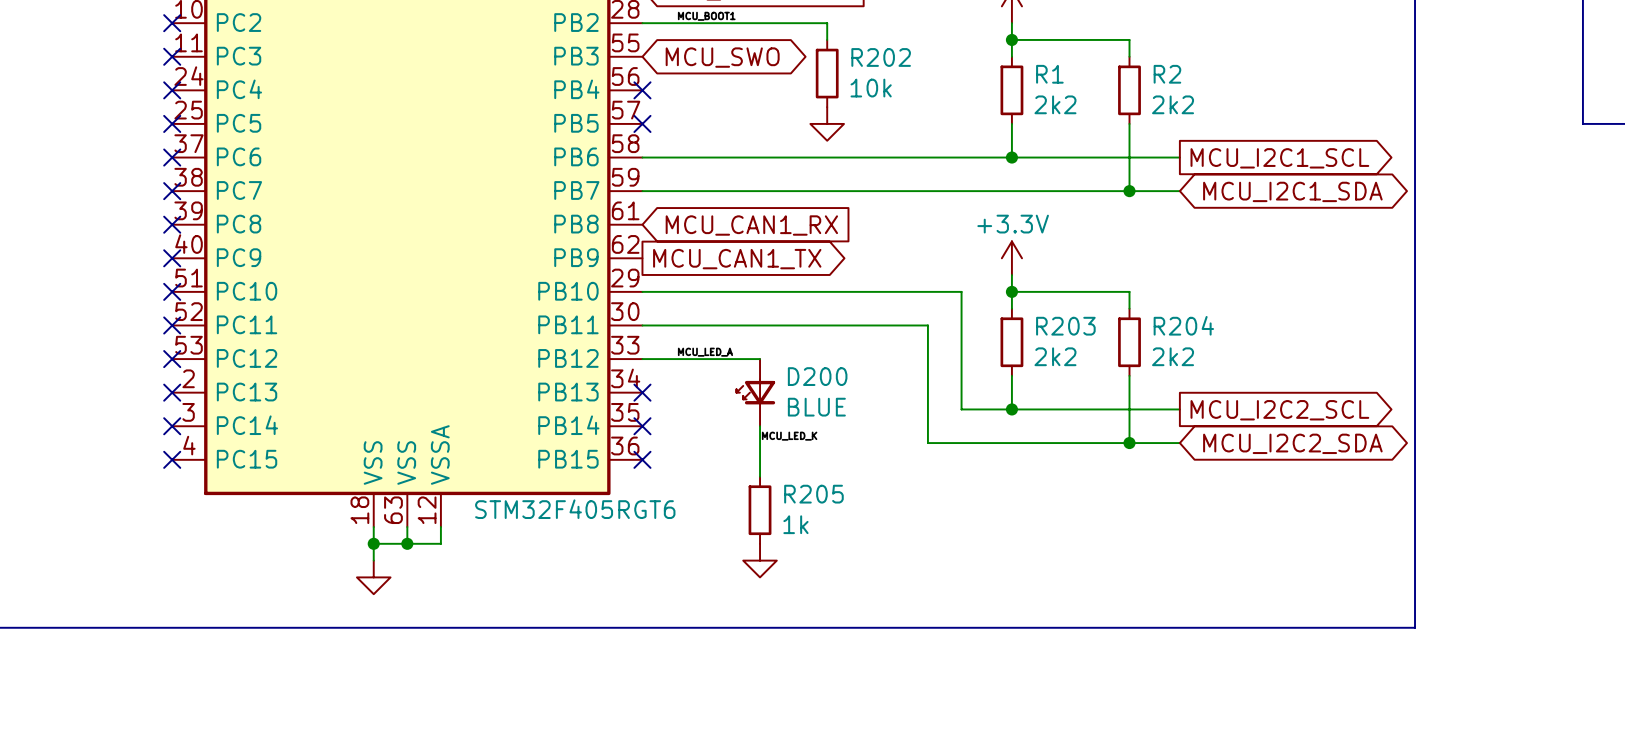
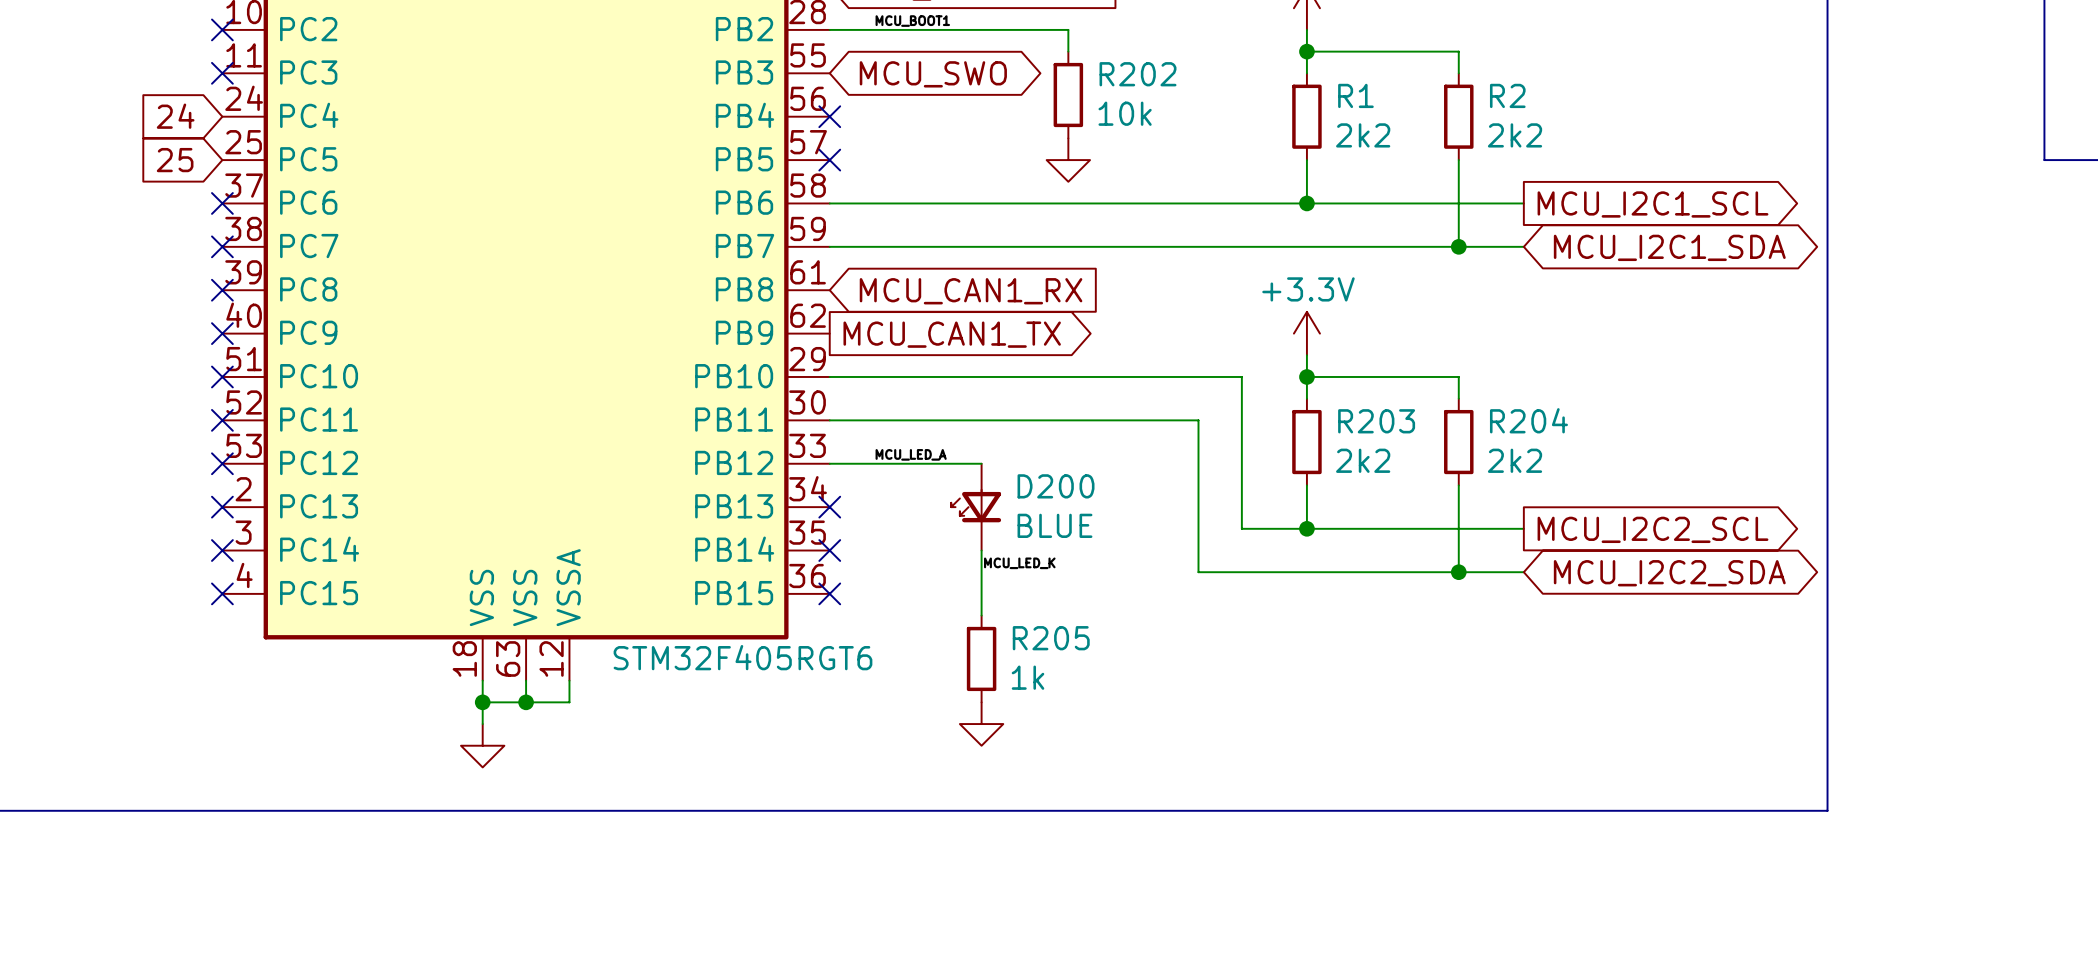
global label: none -> 24 (175, 116)
no-connect mark: (172, 90) -> none
global label: none -> 25 (175, 160)
no-connect mark: (172, 123) -> none

